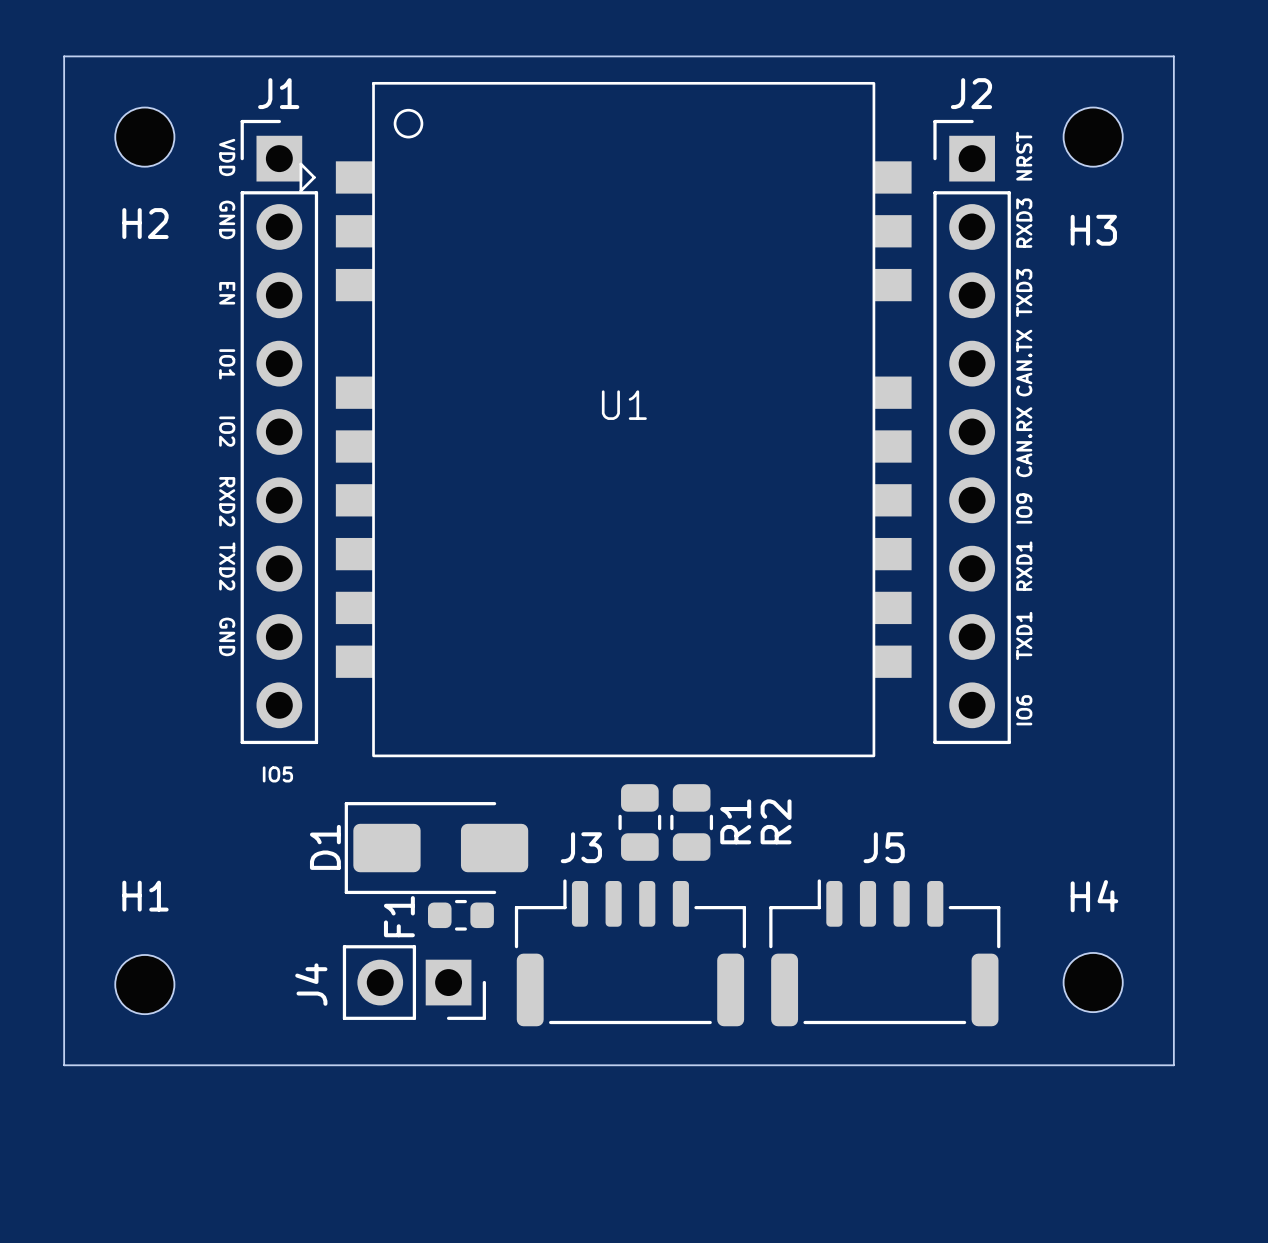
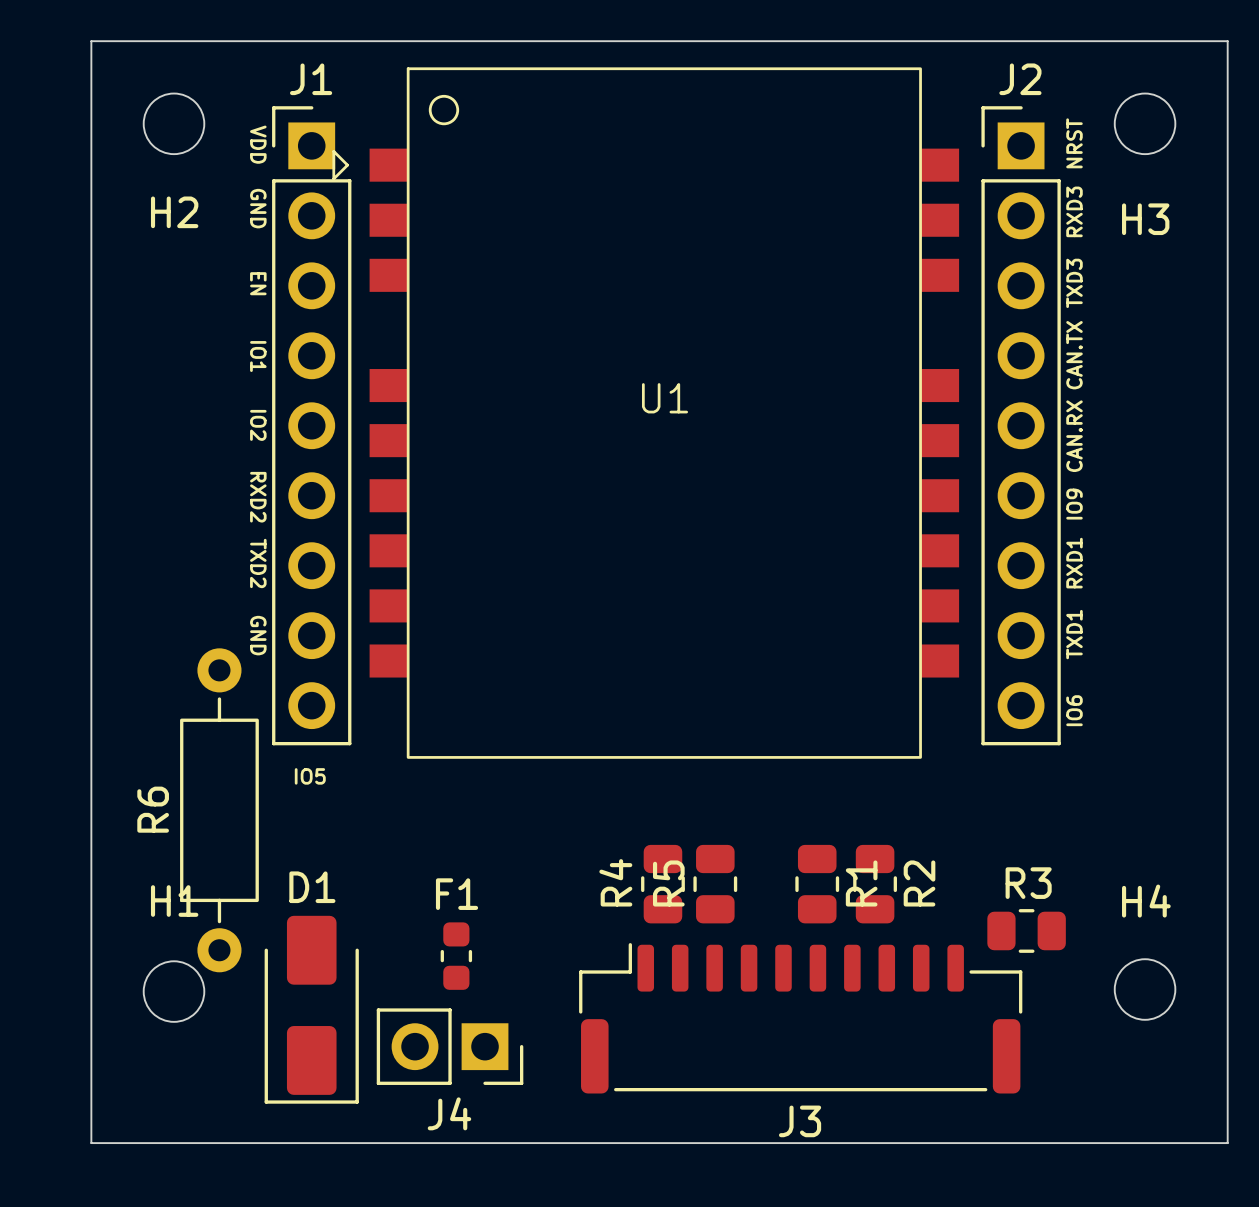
R6: none -> (219, 810)
R1 name position: R1 (735, 821) -> R1 (861, 883)
R2 name position: R2 (776, 821) -> R2 (919, 883)
R1 position: (639, 822) -> (817, 884)
R2 position: (691, 822) -> (875, 884)
D1 name position: D1 (325, 847) -> D1 (312, 887)
J3 name position: J3 (581, 847) -> J3 (800, 1121)
D1 rotation: 0° (436, 848) -> 90° counterclockwise (311, 1009)
D1 position: (436, 848) -> (311, 1009)
J3 footprint: [514, 879, 746, 1027] -> [579, 943, 1023, 1094]
R4: none -> (662, 884)
R5: none -> (715, 884)
F1 rotation: 0° (460, 915) -> 90° clockwise (456, 956)
F1 position: (460, 915) -> (456, 956)
R3: none -> (1026, 930)
J5: (884, 952) -> none
J4 position: (414, 982) -> (450, 1046)
J4 name rotation: 0° (311, 984) -> 90° clockwise (449, 1113)
J4 name position: J4 (311, 984) -> J4 (449, 1113)
board edge: (64, 1065) (1173, 1065) -> (91, 1074) (91, 1143) (1227, 1143) (1227, 1074)

